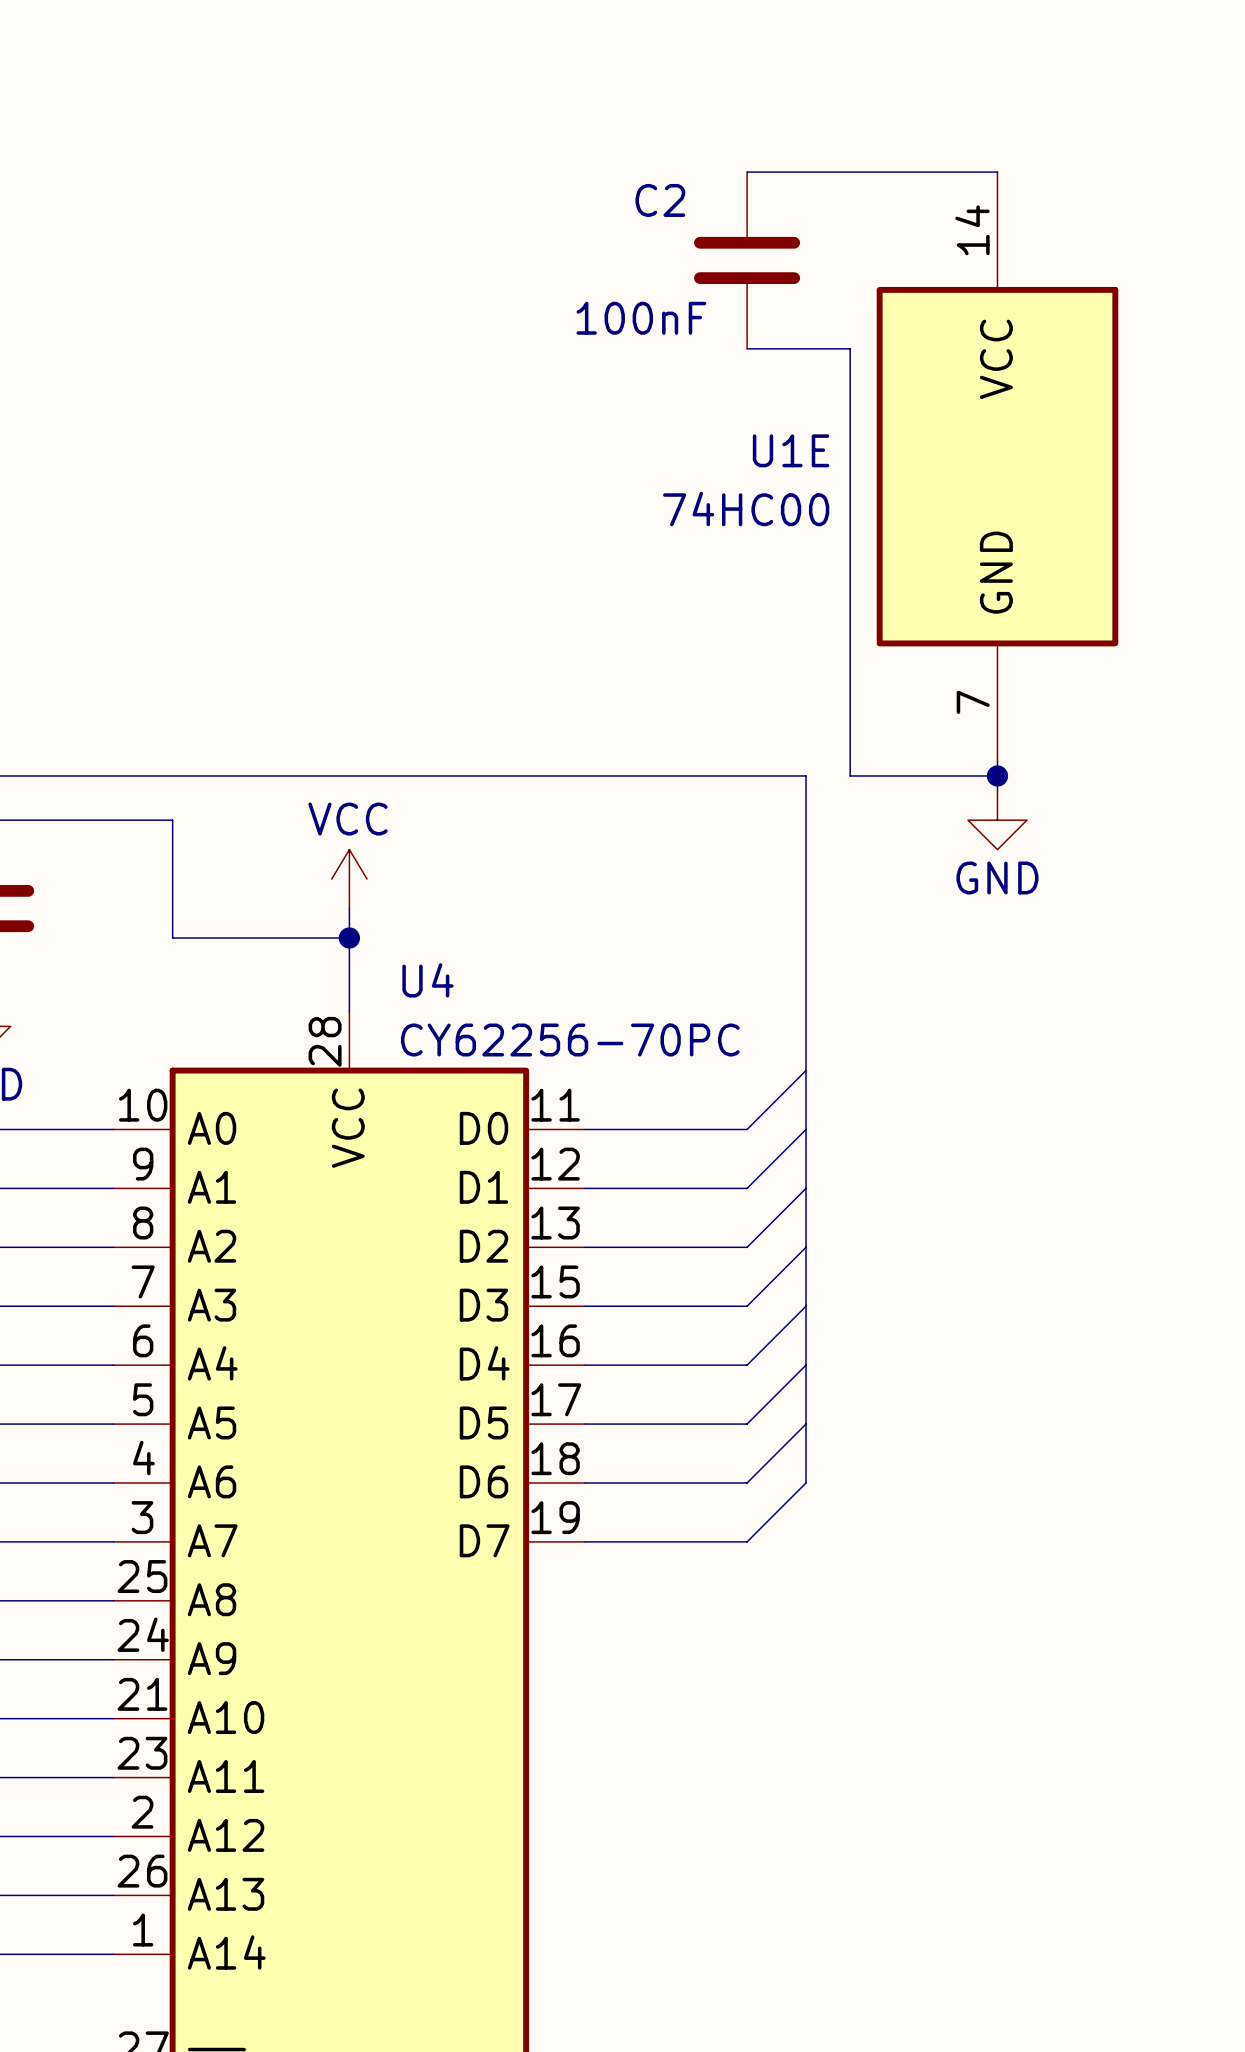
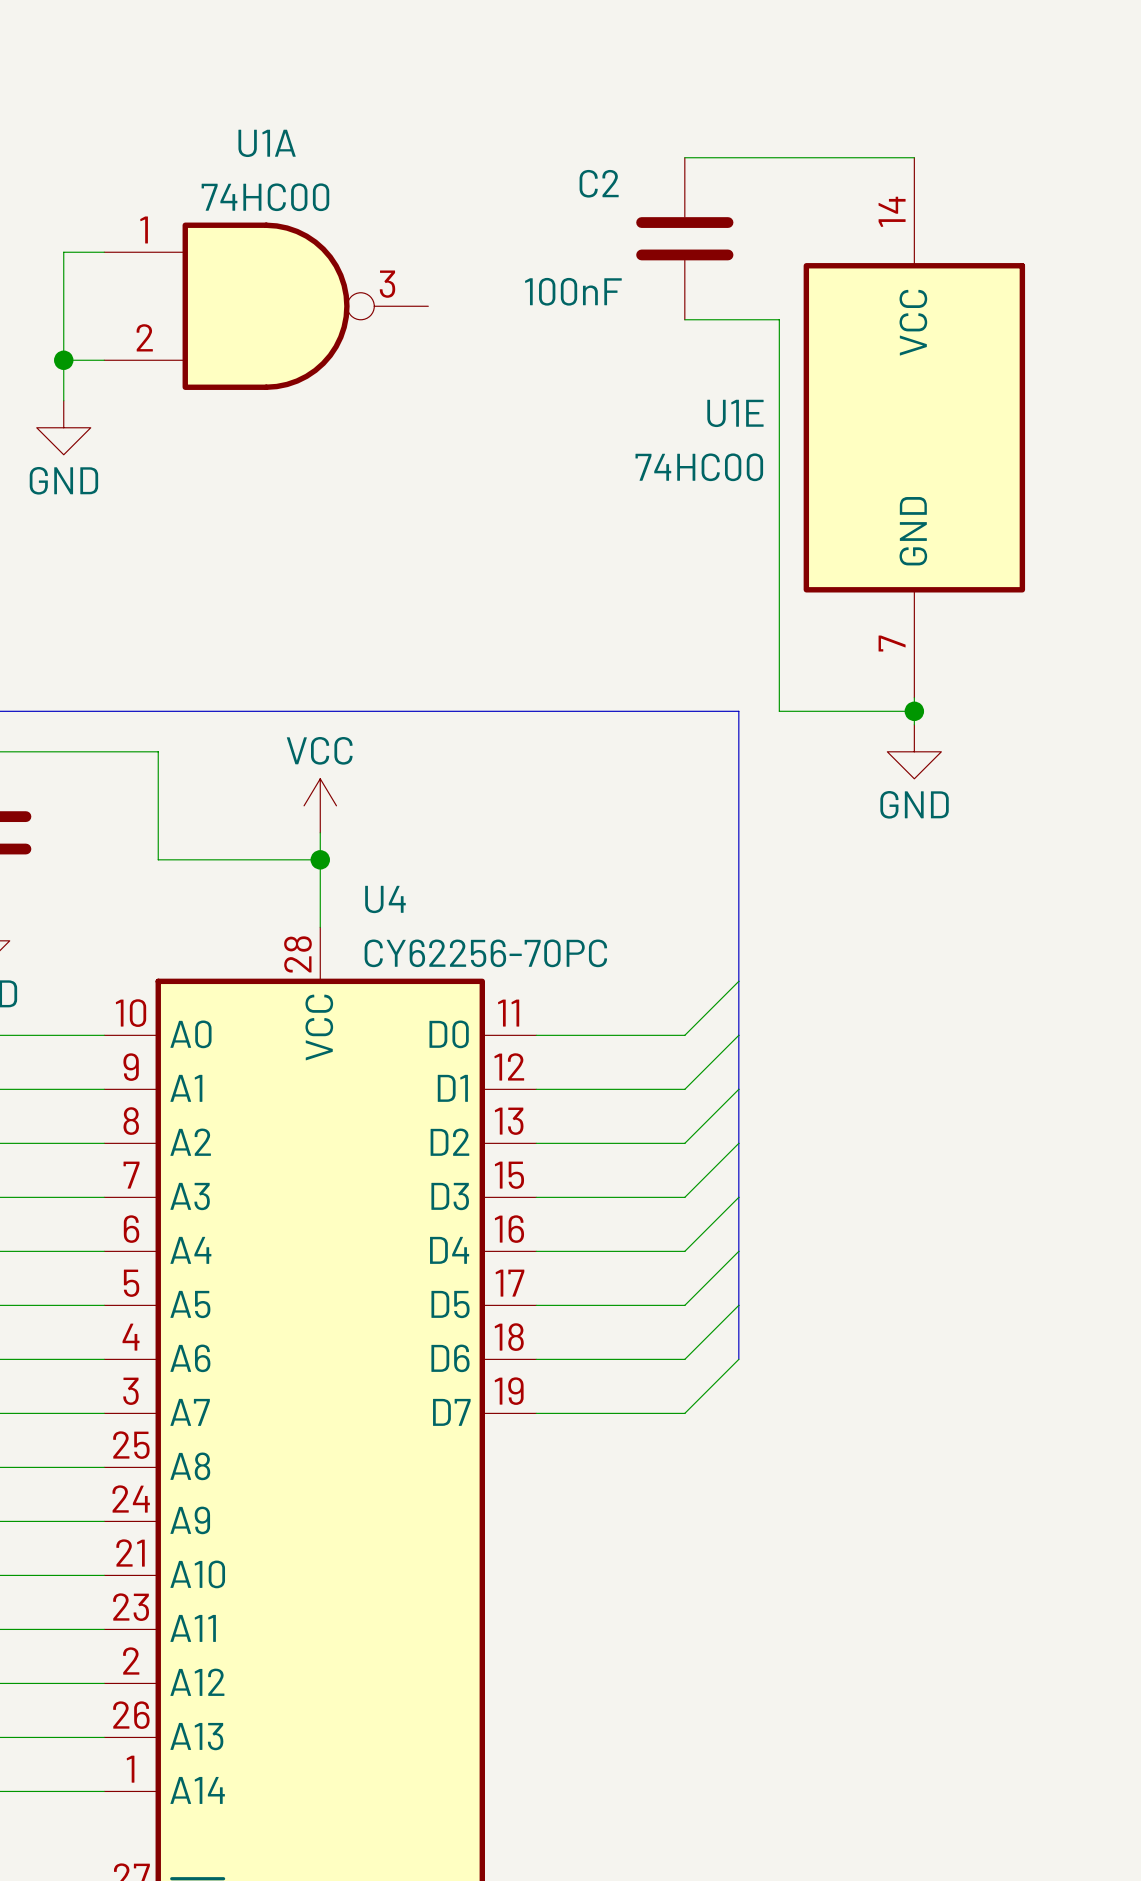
wire: none -> (104, 252) (63, 252) (63, 400)
U1A: none -> 74HC00 (266, 306)
wire: none -> (63, 360) (104, 360)
junction: none -> (63, 360)
power symbol: none -> GND (63, 427)

